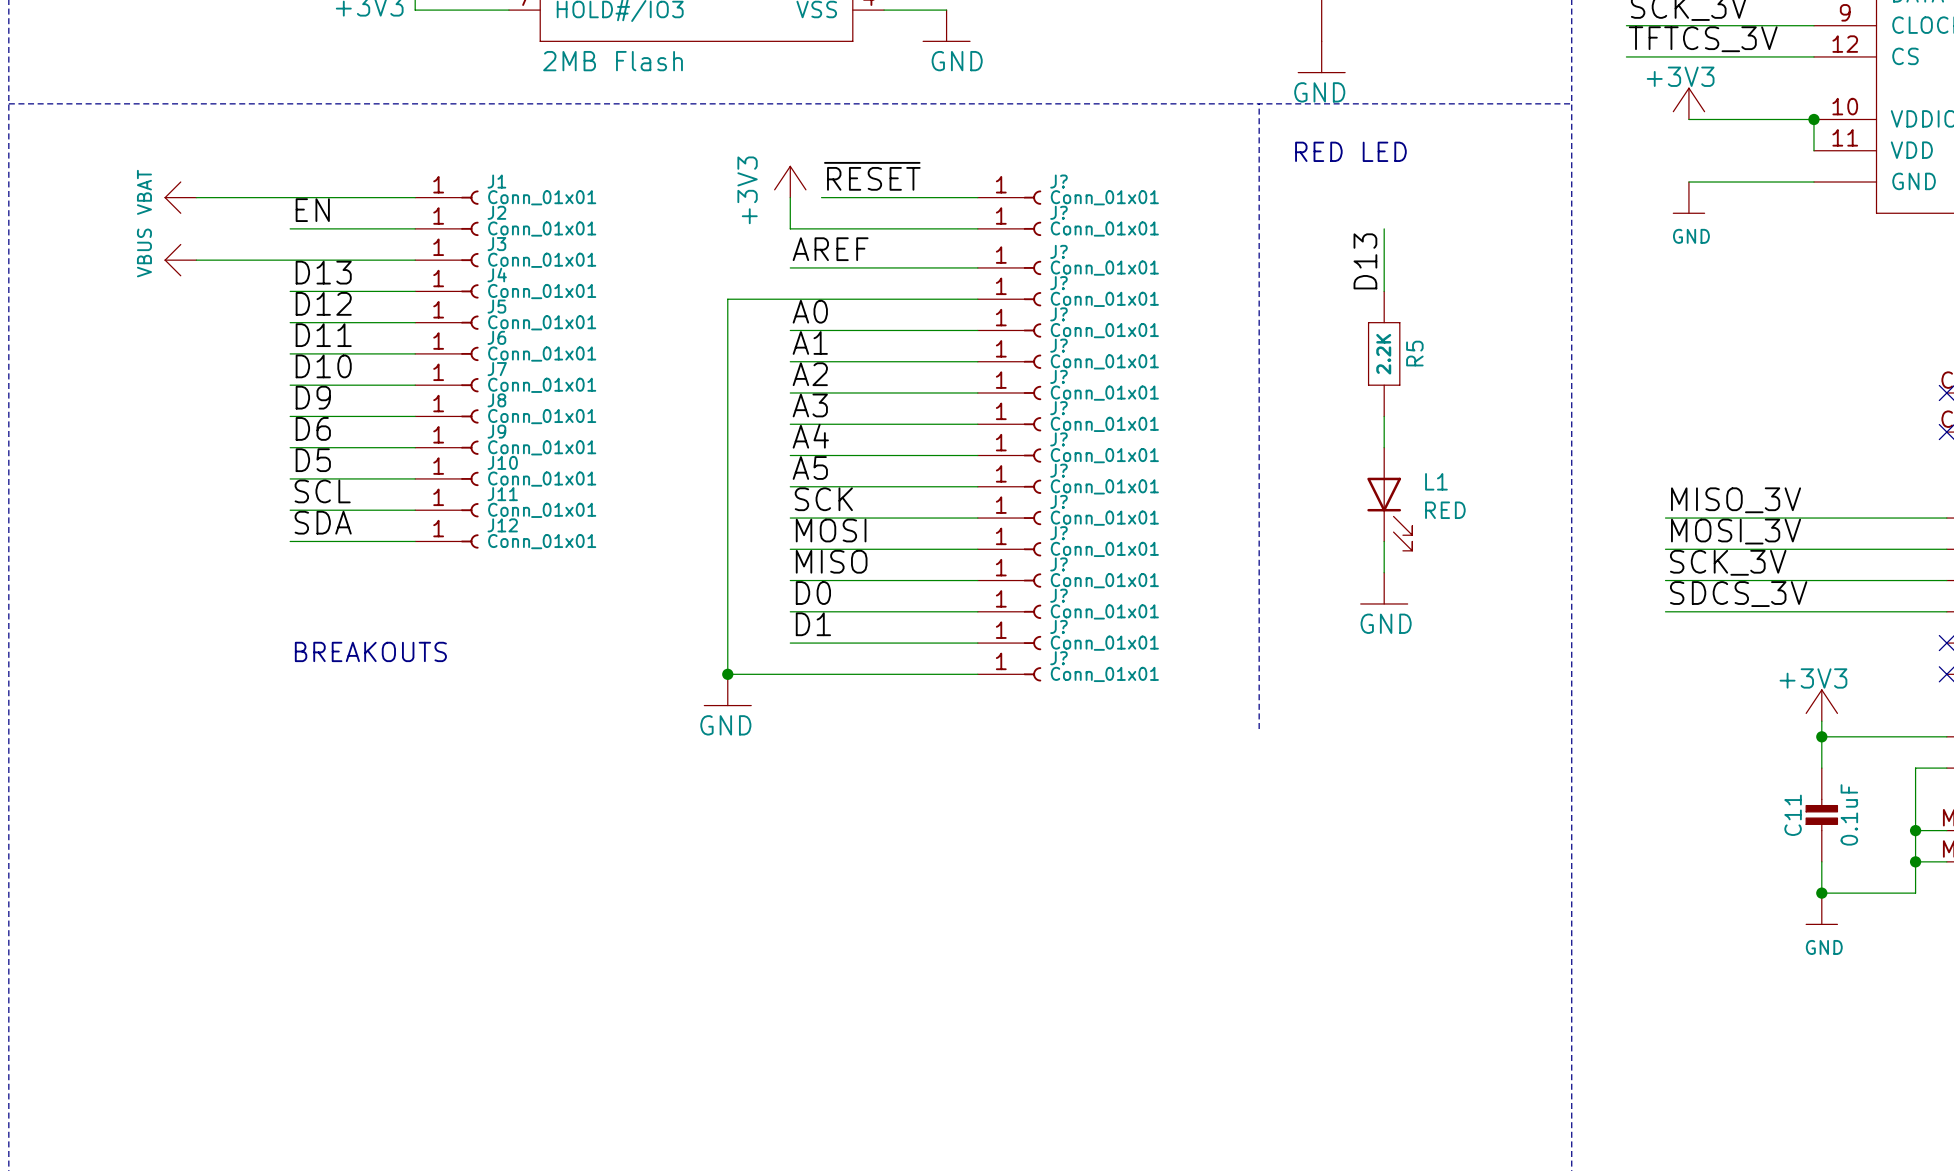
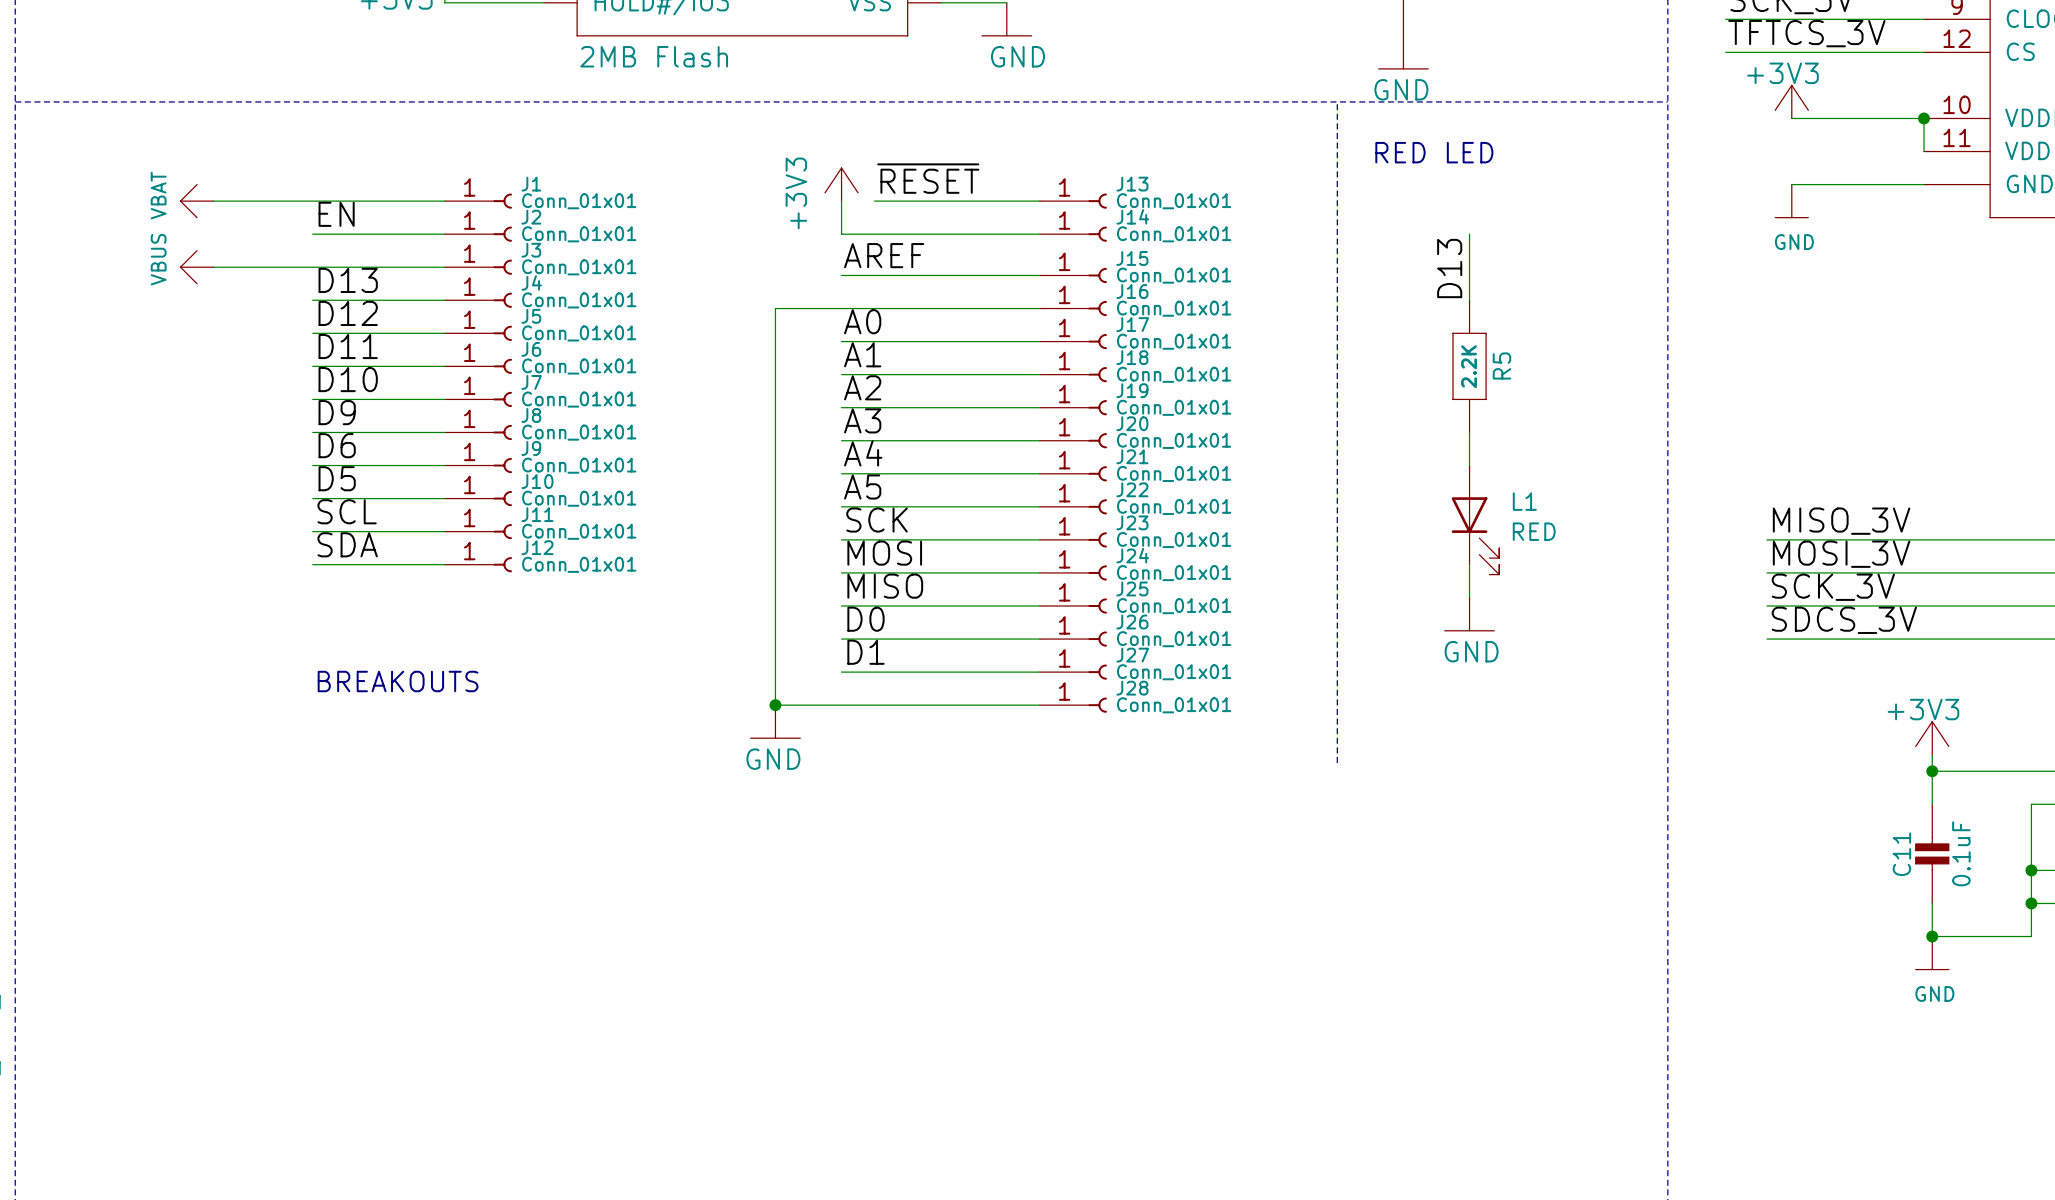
J? name: J? (1058, 181) -> J13 (1132, 184)
J? name: J? (1058, 212) -> J14 (1132, 216)
J? name: J? (1058, 251) -> J15 (1132, 258)
J? name: J? (1058, 283) -> J16 (1132, 291)
J? name: J? (1058, 314) -> J17 (1132, 324)
J? name: J? (1058, 345) -> J18 (1132, 357)
J? name: J? (1058, 376) -> J19 (1132, 390)
J? name: J? (1058, 408) -> J20 (1132, 423)
J? name: J? (1058, 439) -> J21 (1132, 456)
J? name: J? (1058, 470) -> J22 (1132, 489)
J? name: J? (1058, 501) -> J23 (1132, 522)
J? name: J? (1058, 533) -> J24 (1132, 555)
J? name: J? (1058, 564) -> J25 (1132, 588)
J? name: J? (1058, 595) -> J26 (1132, 622)
J? name: J? (1058, 626) -> J27 (1132, 655)
J? name: J? (1058, 658) -> J28 (1132, 688)

